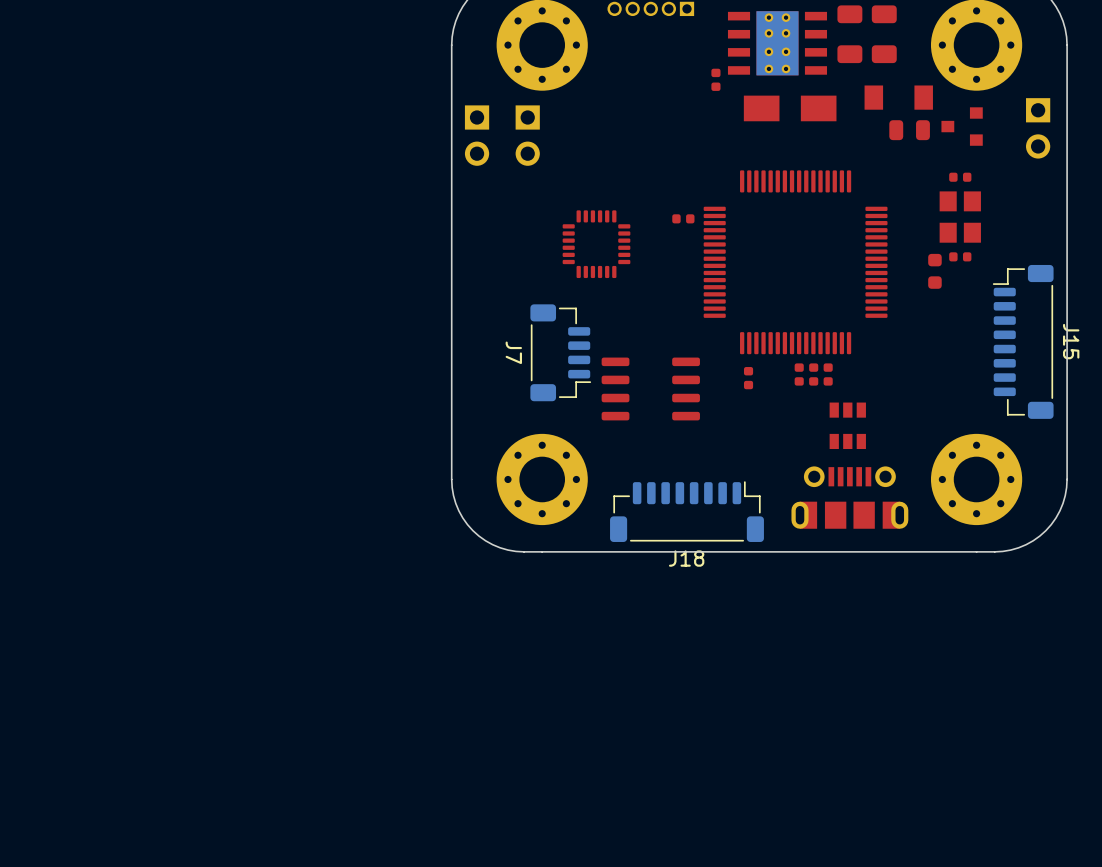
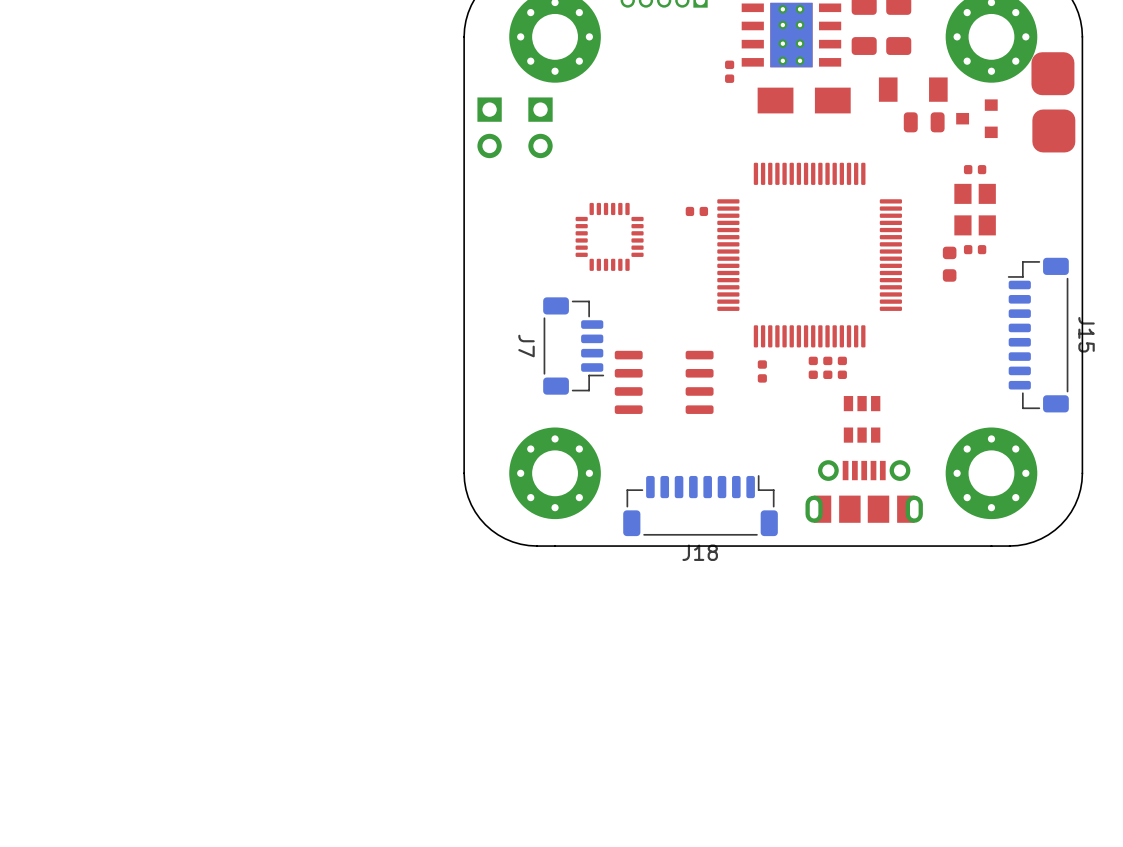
part: none -> (1053, 102)
part: (1038, 128) -> none

